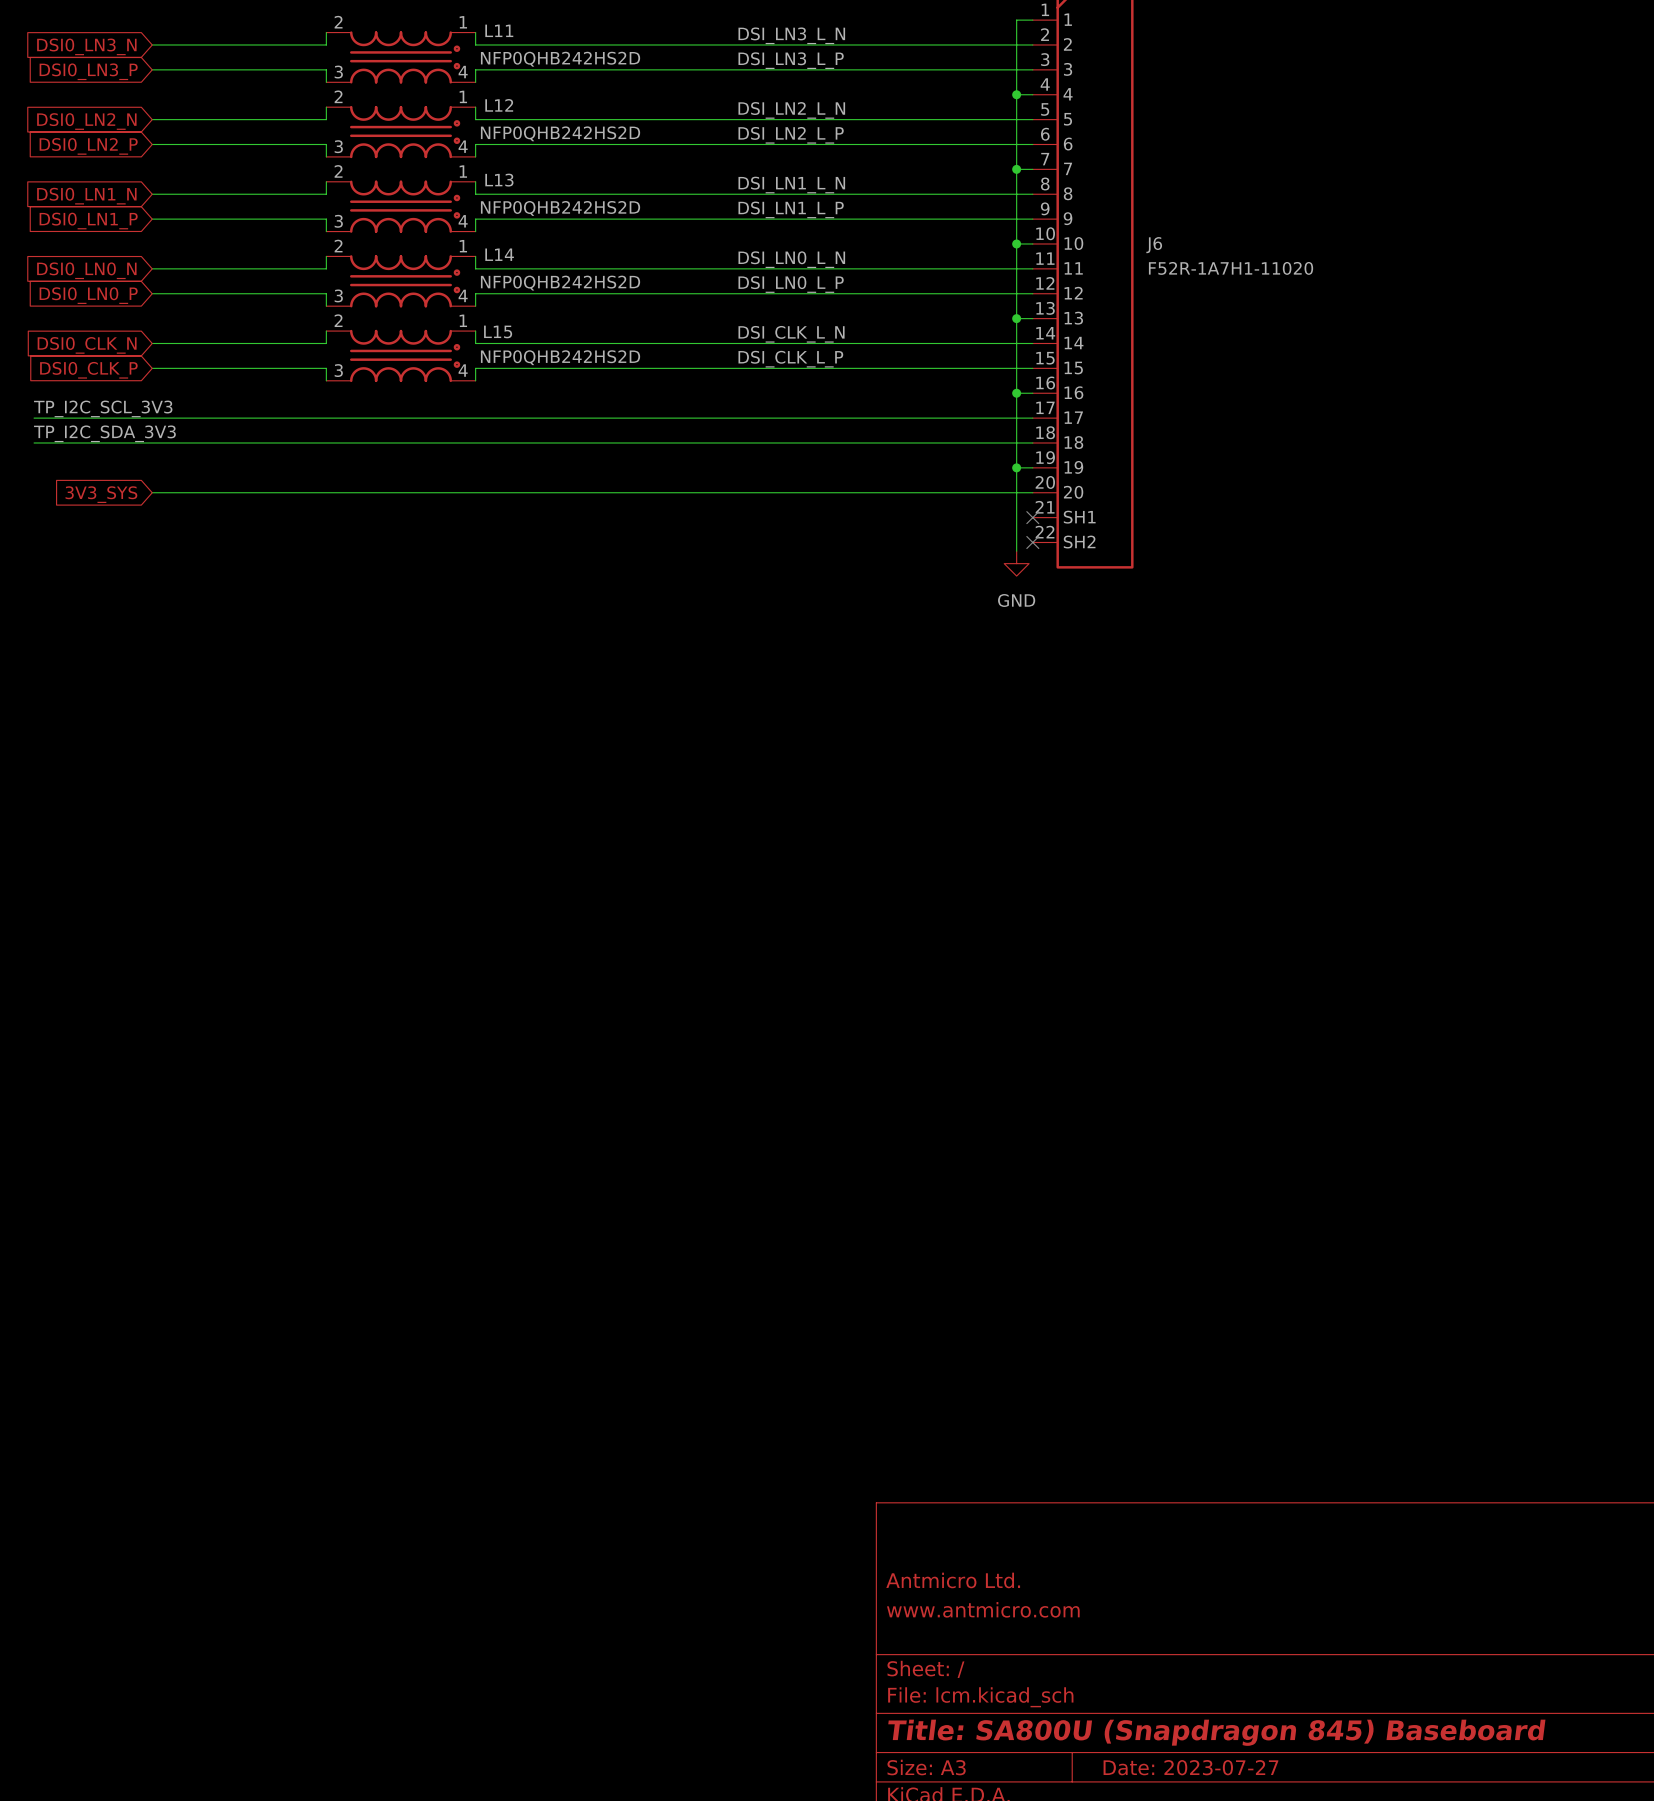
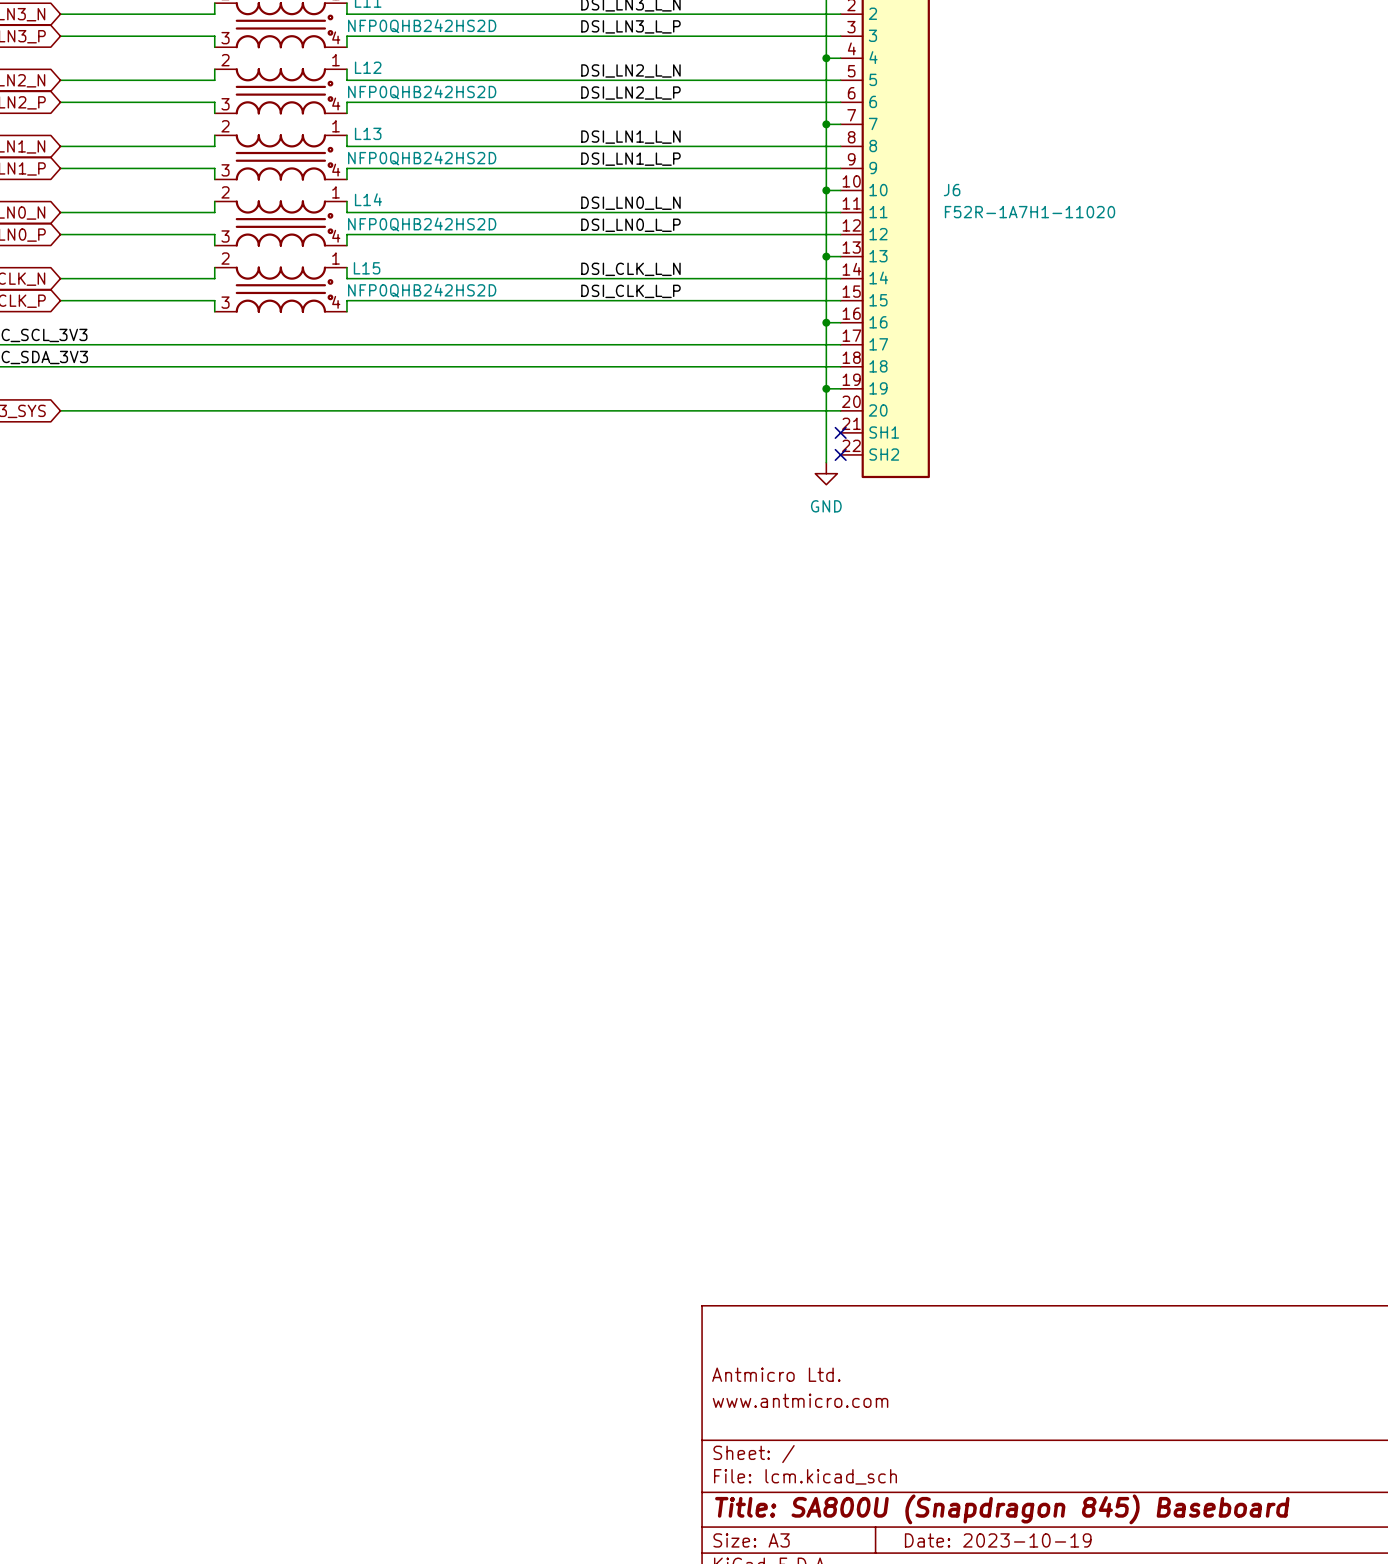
title block: Date: 2023-07-27 (1190, 1767) -> Date: 2023-10-19 (998, 1540)

